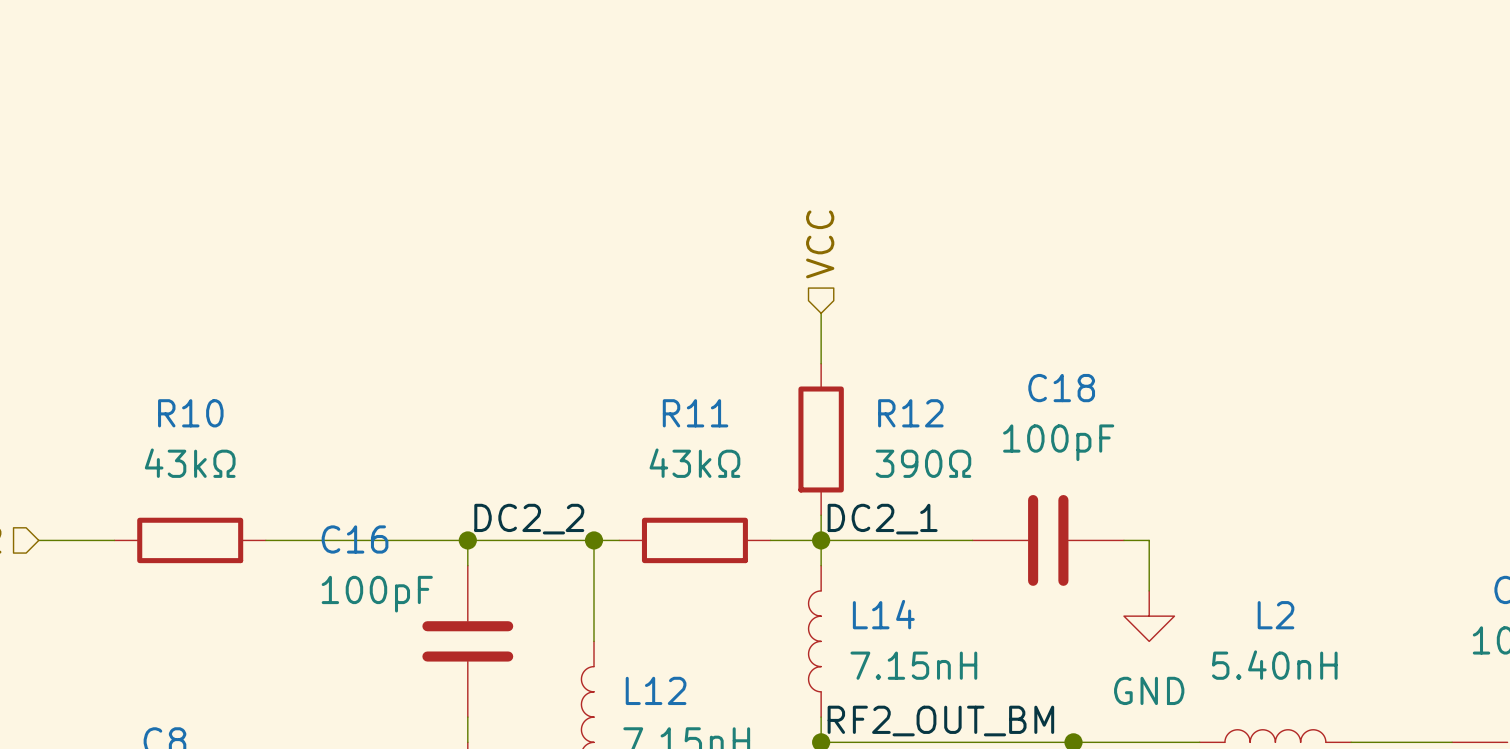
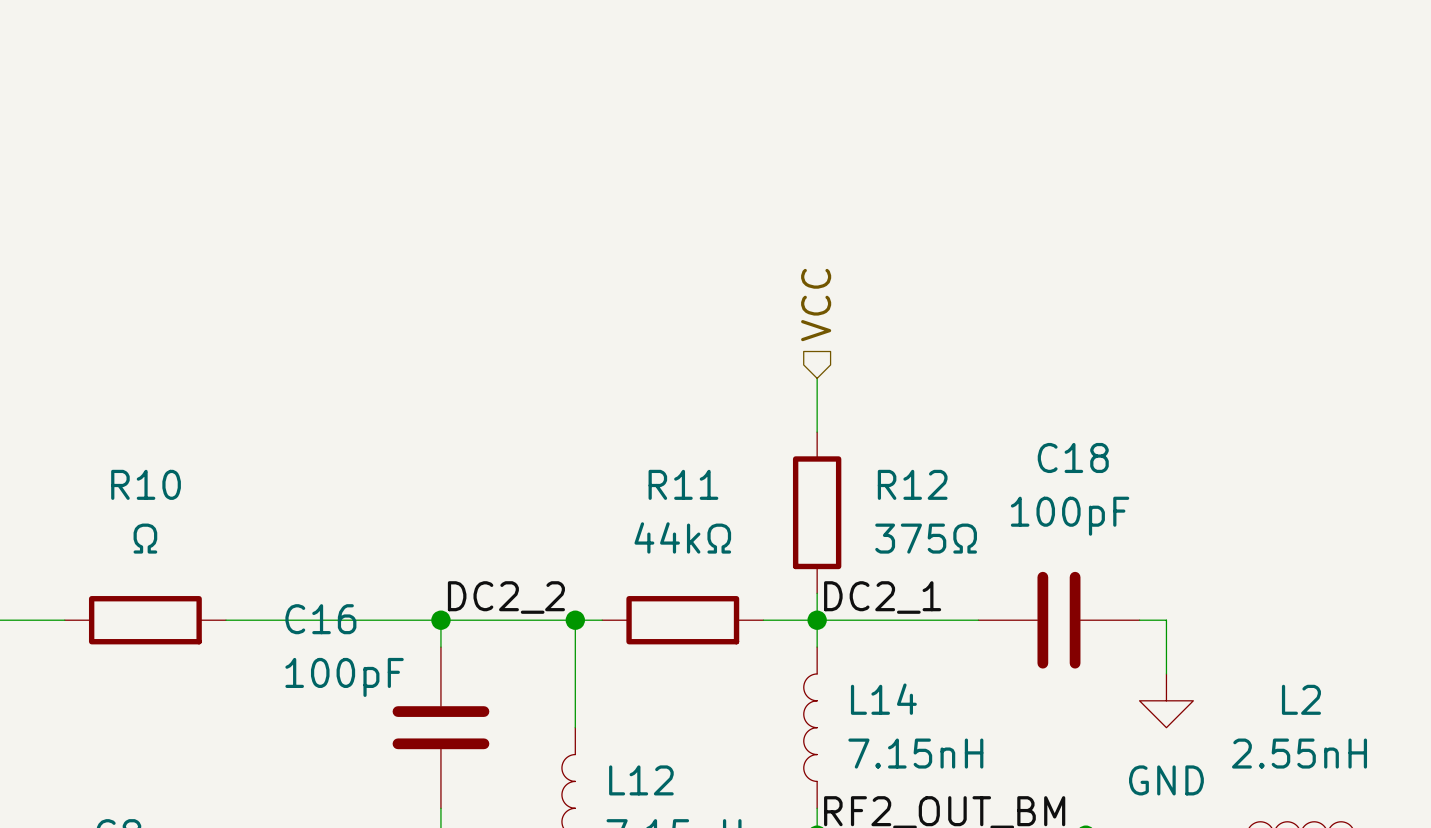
R10 value: 43kΩ (190, 463) -> Ω (145, 538)
R11 value: 43kΩ (694, 463) -> 44kΩ (682, 537)
R12 value: 390Ω (923, 463) -> 375Ω (926, 538)
L2 value: 5.40nH (1274, 665) -> 2.55nH (1299, 753)

